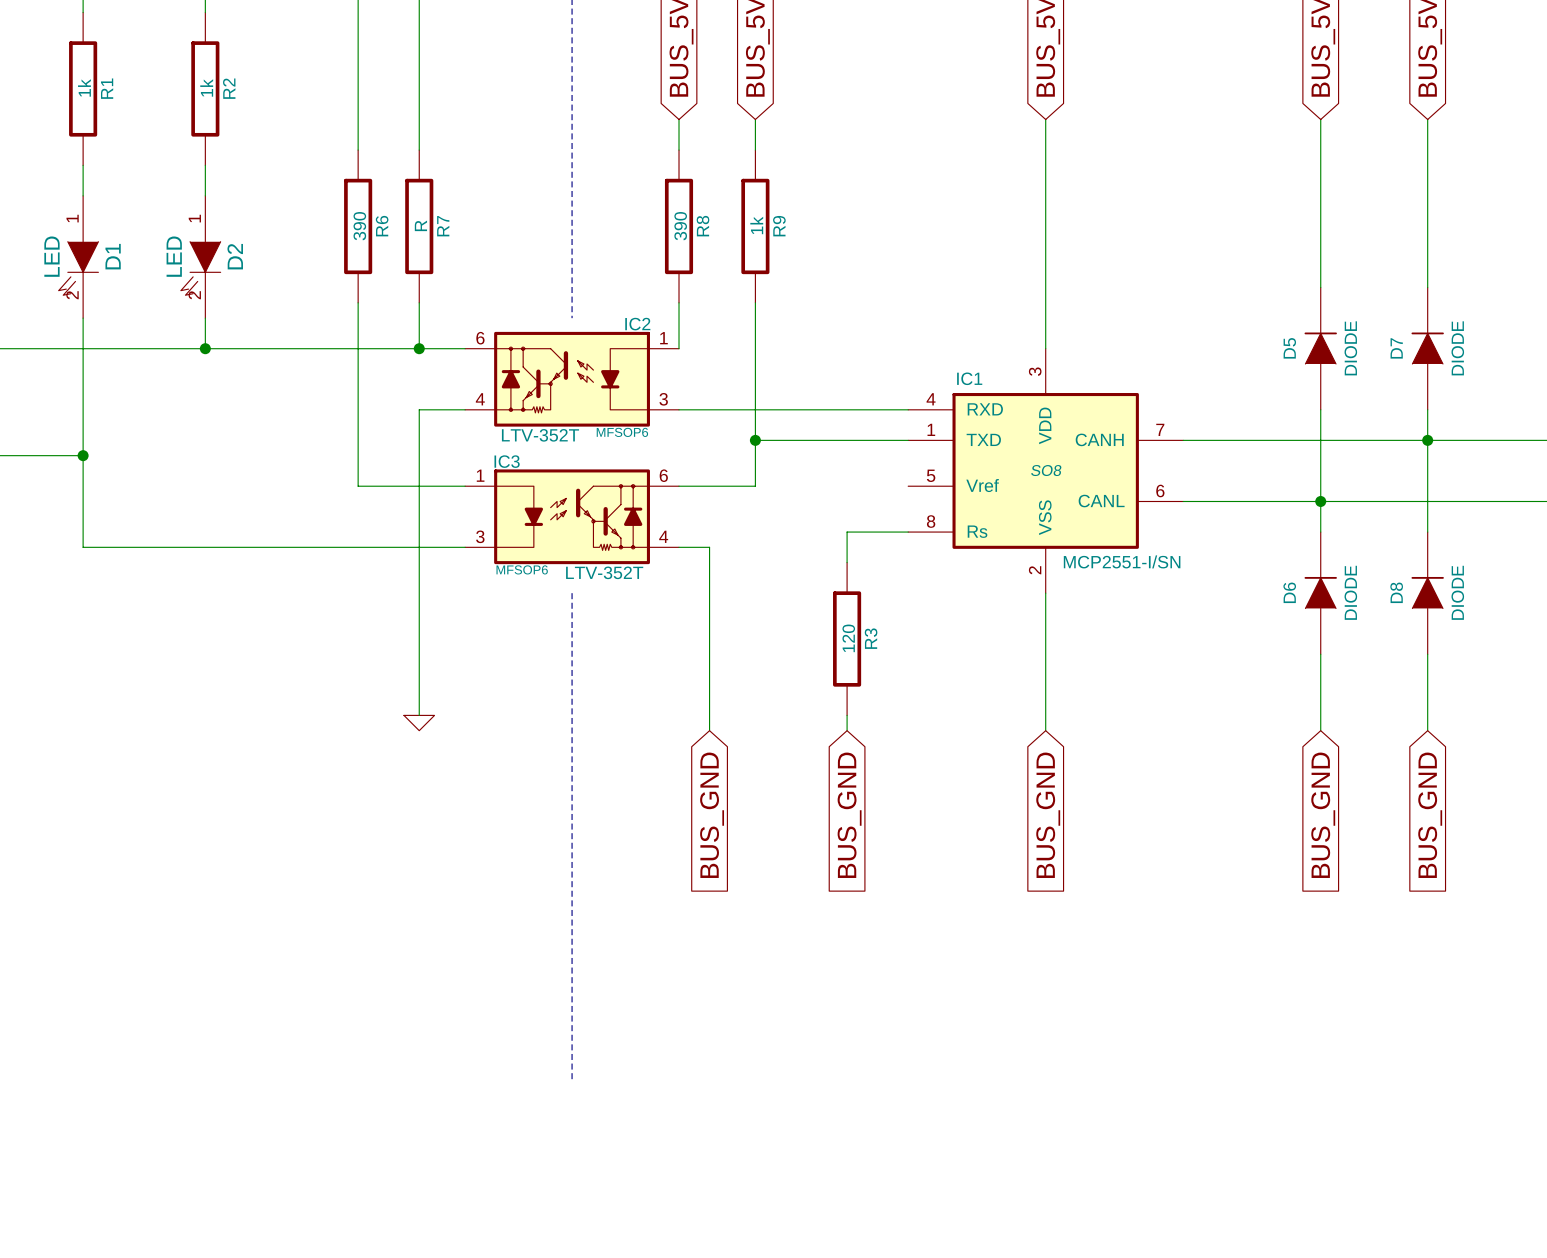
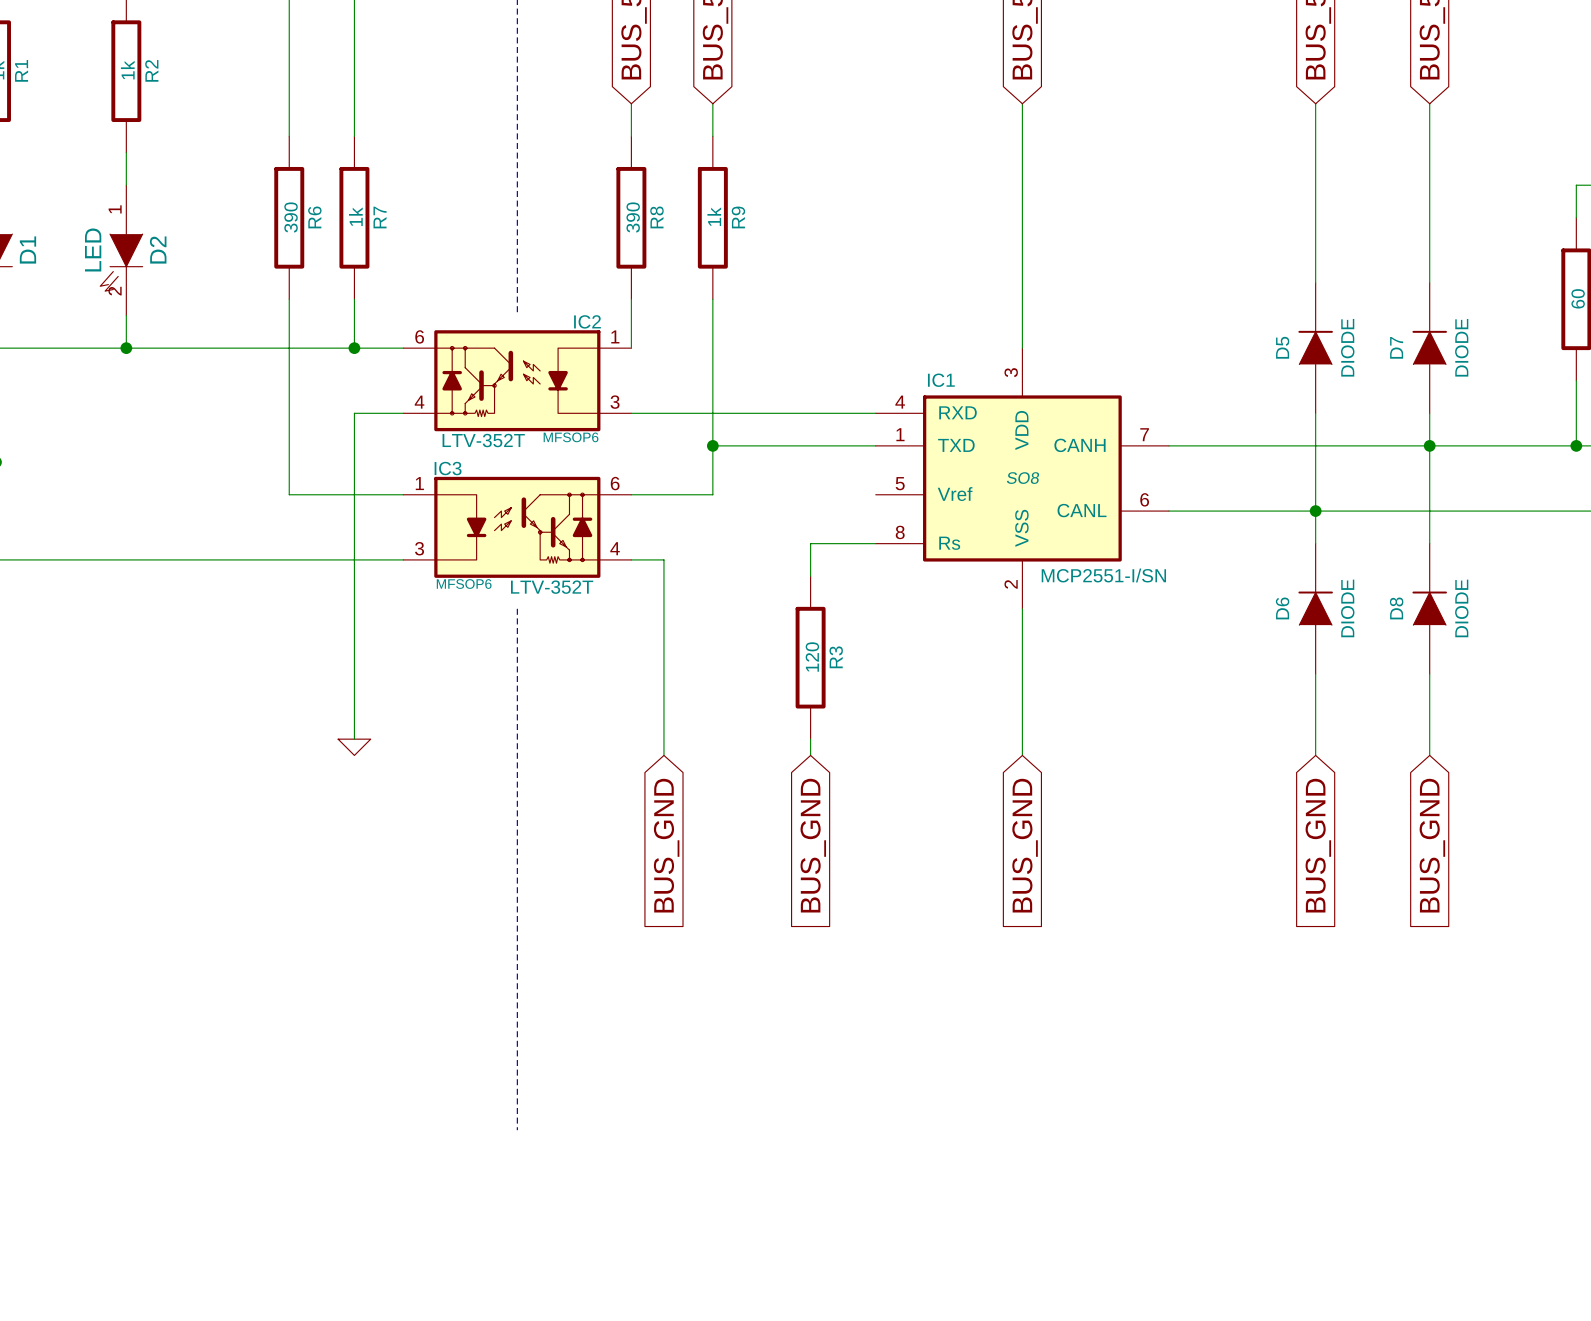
R7 value: R (420, 225) -> 1k (355, 216)

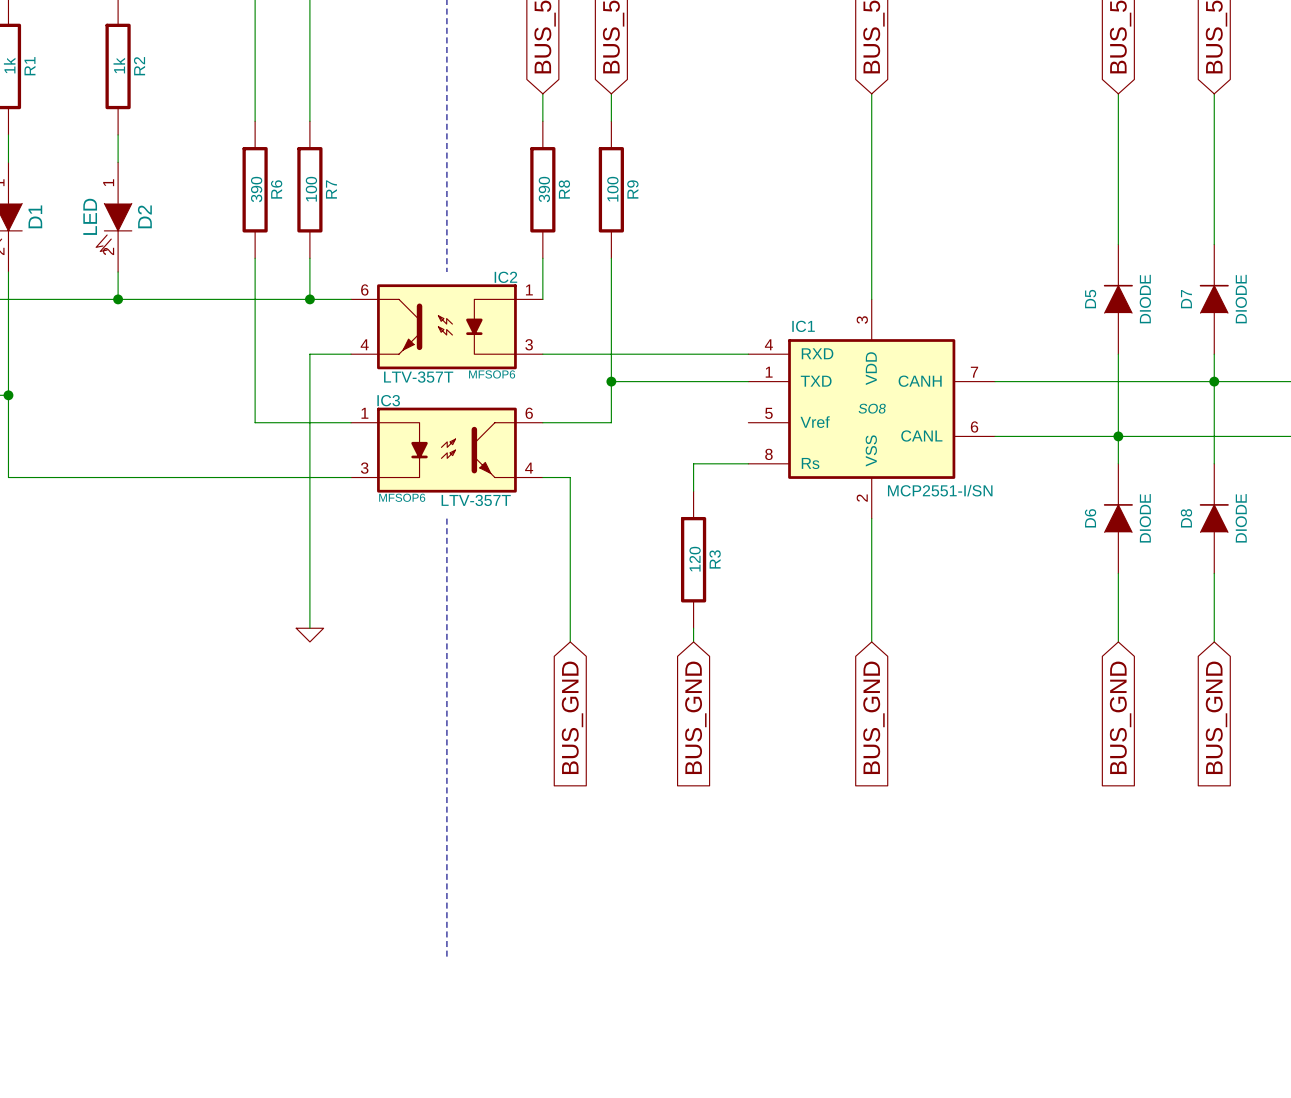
R7 value: 1k (355, 216) -> 100 (311, 189)
R9 value: 1k (714, 216) -> 100 (612, 189)
IC2 symbol: [403, 330, 632, 432] -> [351, 284, 543, 370]
IC2 value: LTV-352T (483, 440) -> LTV-357T (418, 377)
IC3 symbol: [403, 476, 632, 578] -> [351, 407, 543, 493]
IC3 value: LTV-352T (552, 587) -> LTV-357T (476, 500)

